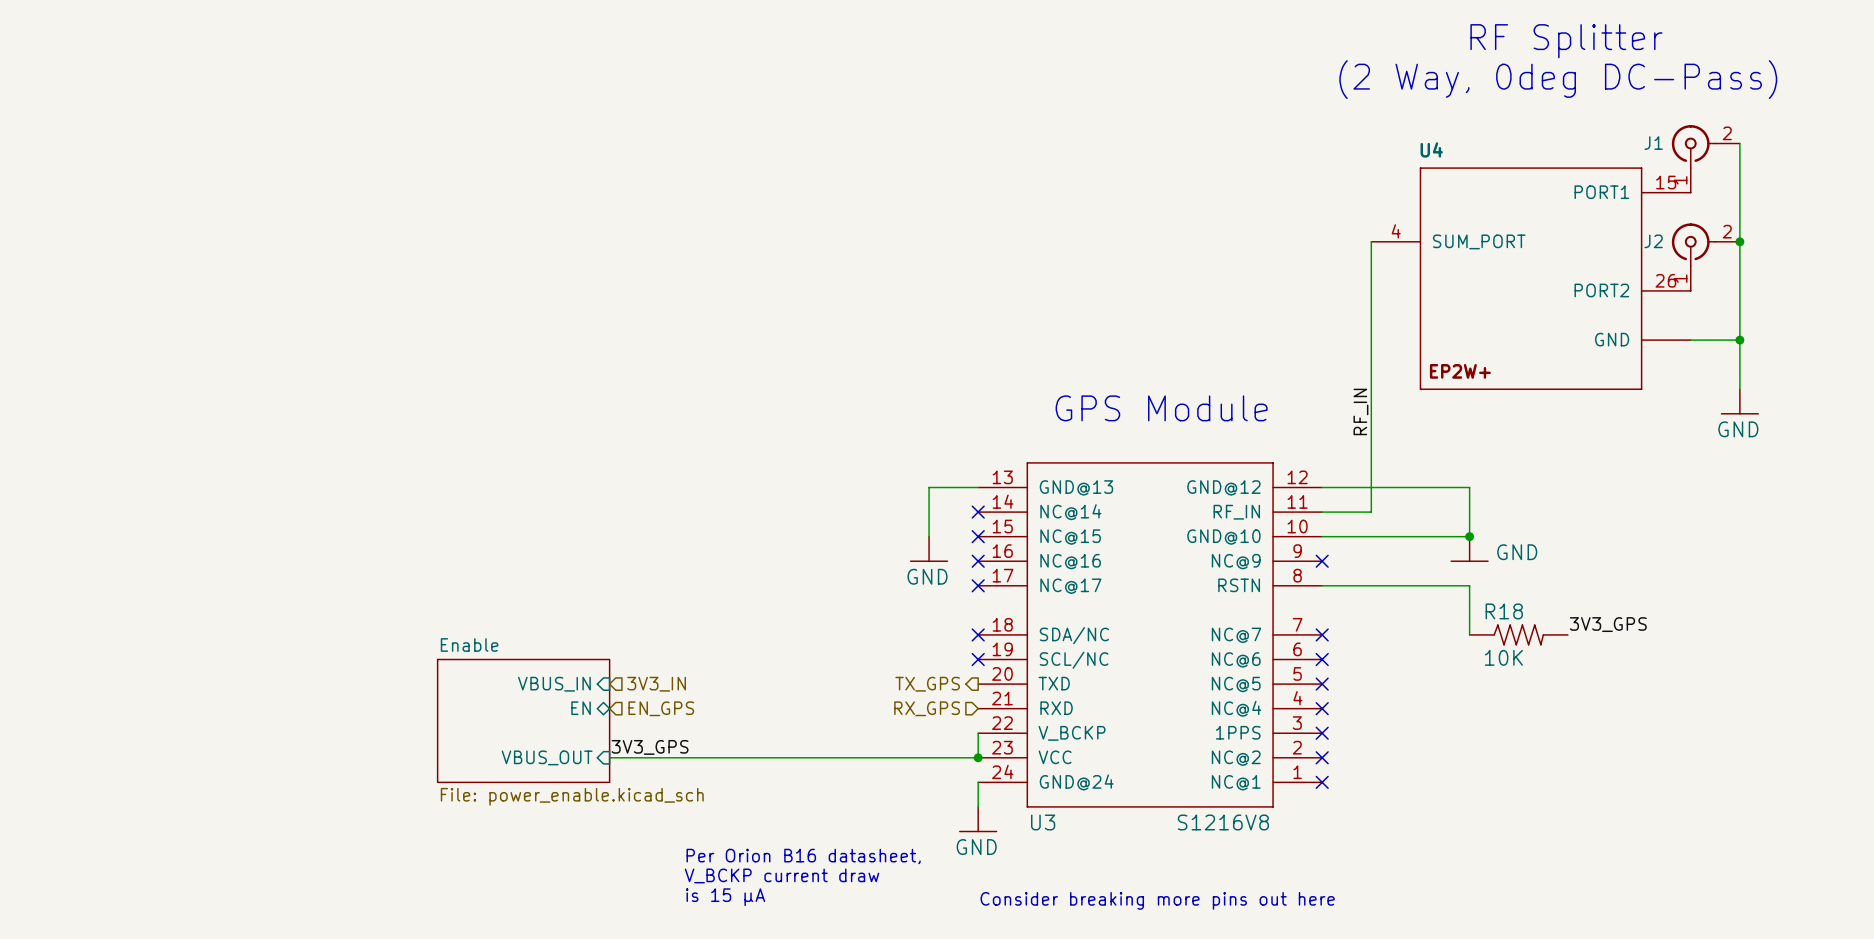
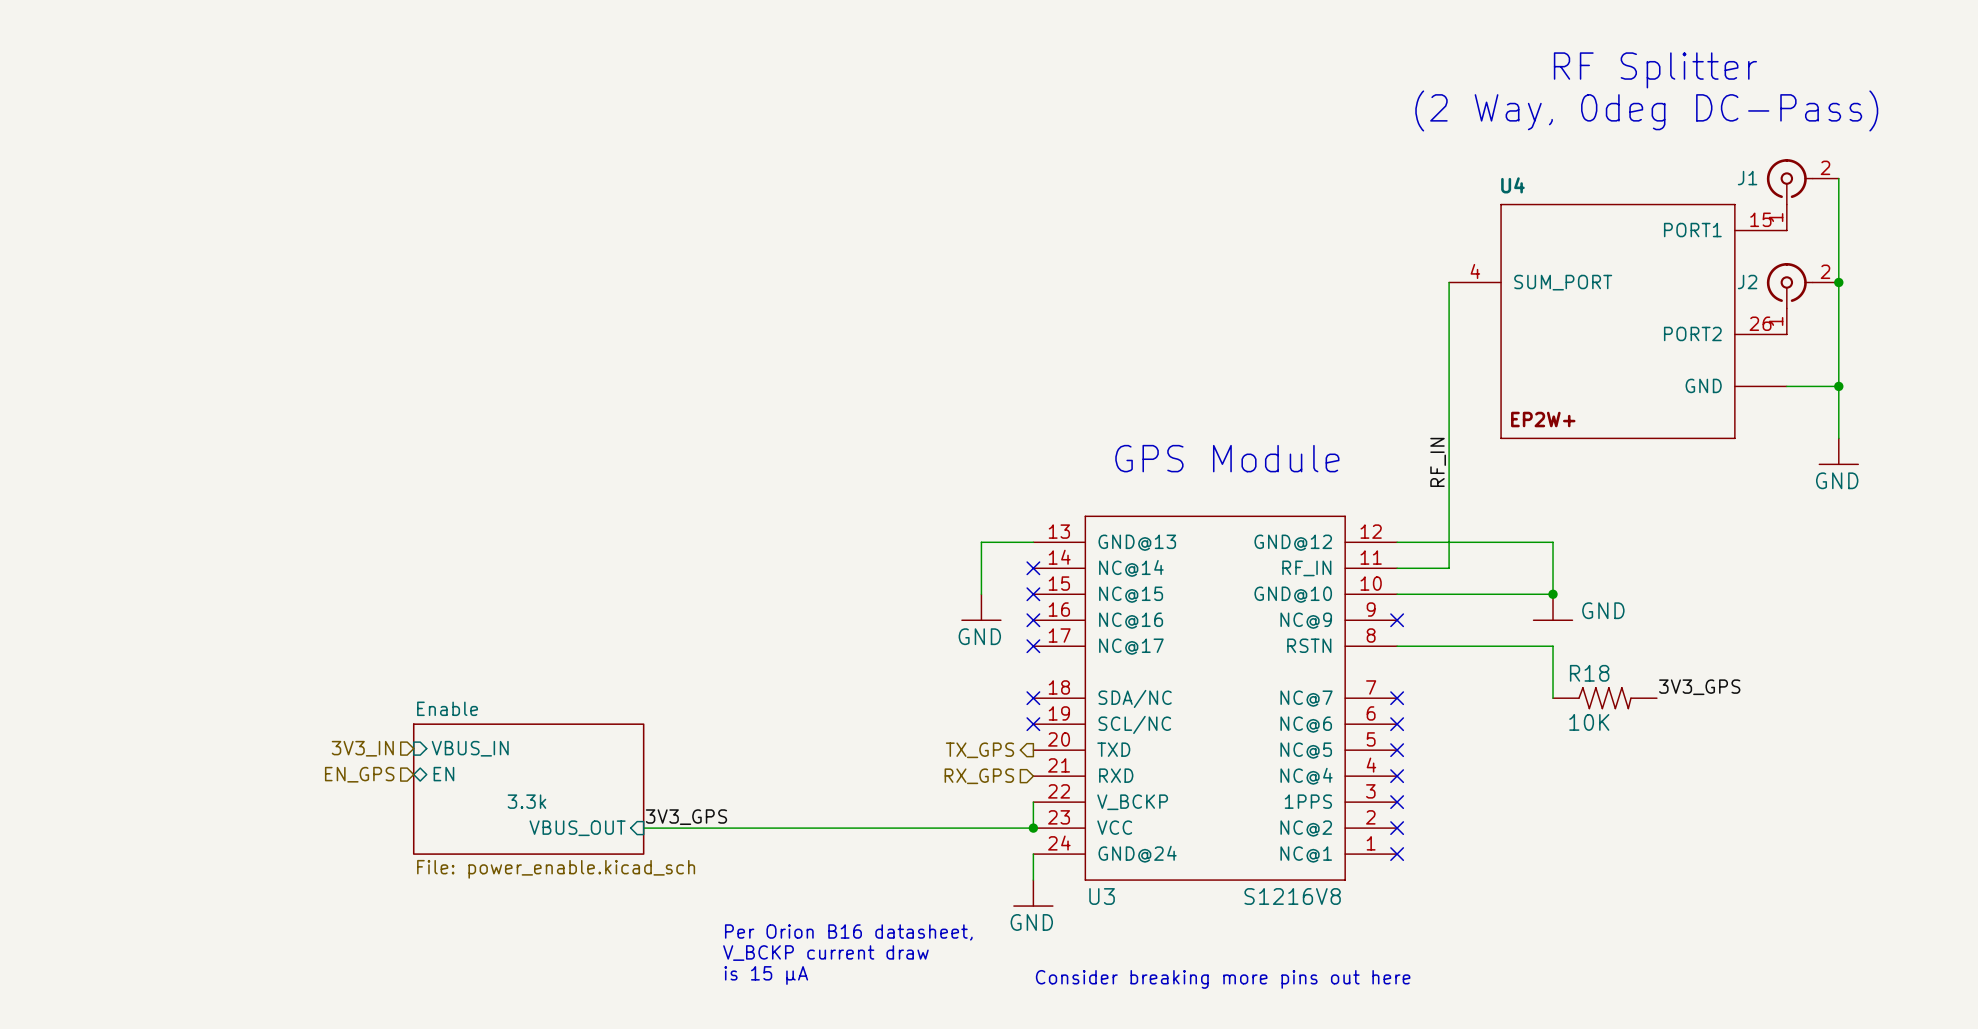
hierarchical label: none -> 3V3_IN (362, 748)
sheet pin rotation: 0° (554, 684) -> 180° (470, 748)
sheet pin position: VBUS_IN (554, 684) -> VBUS_IN (470, 748)
hierarchical label: 3V3_IN (656, 684) -> none
hierarchical label: none -> EN_GPS (359, 774)
sheet pin rotation: 0° (581, 708) -> 180° (443, 774)
sheet pin position: EN (581, 708) -> EN (443, 774)
hierarchical label: EN_GPS (661, 708) -> none
sheet Enable: none -> File: power_enable.kicad_sch (528, 789)
sheet Enable: File: power_enable.kicad_sch (523, 720) -> none

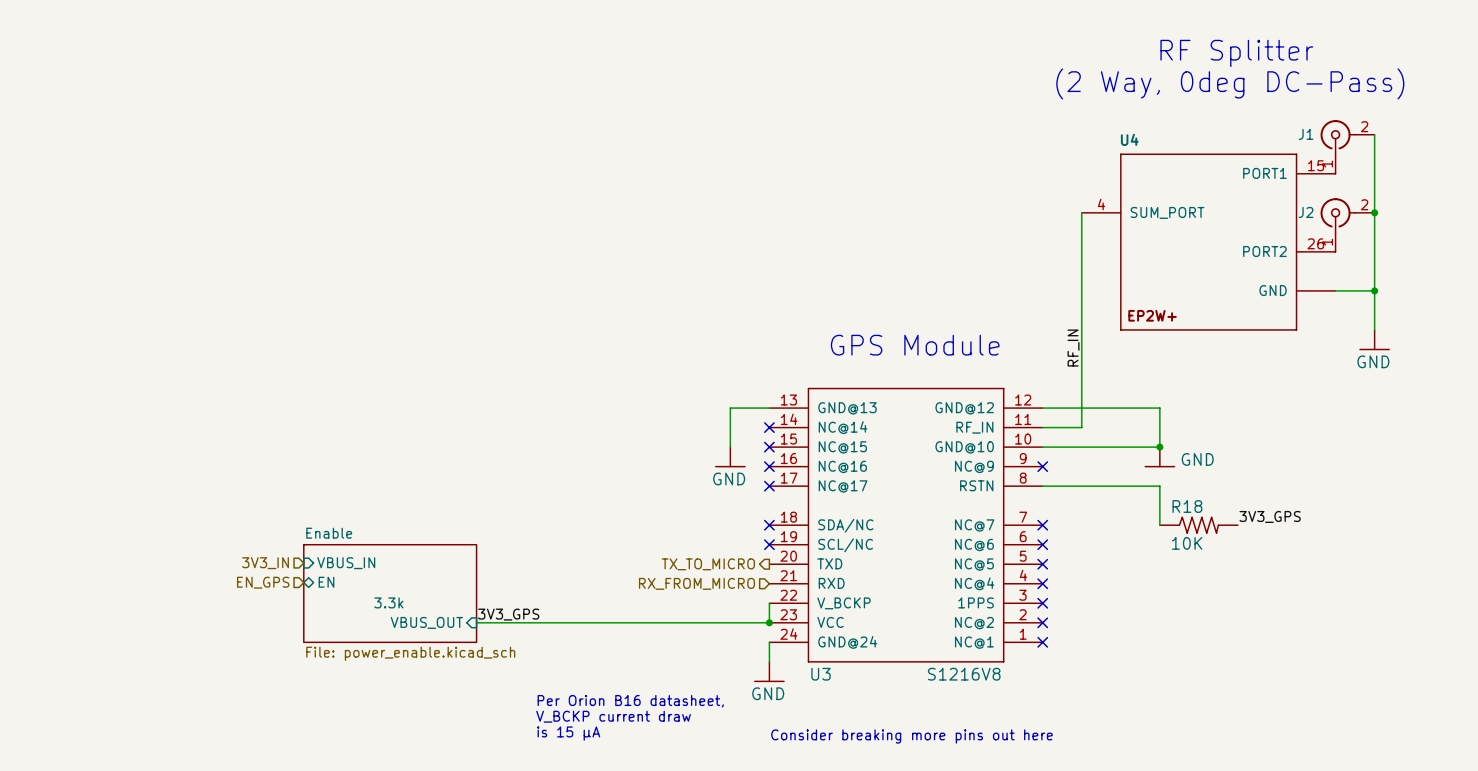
hierarchical label: TX_GPS (979, 750) -> TX_TO_MICRO (708, 564)
hierarchical label: RX_GPS (979, 776) -> RX_FROM_MICRO (696, 583)

